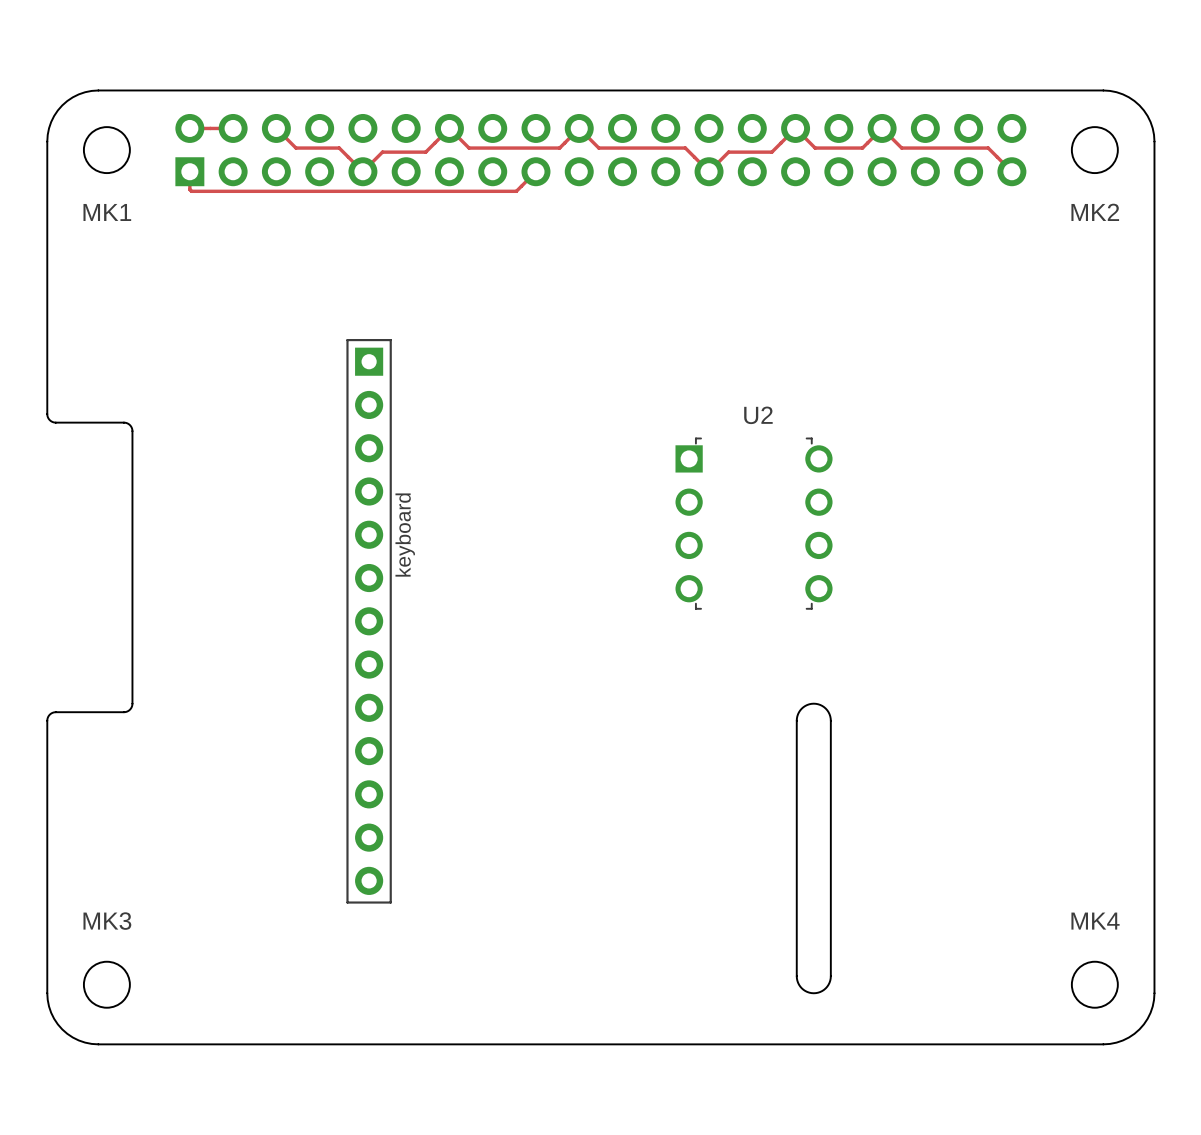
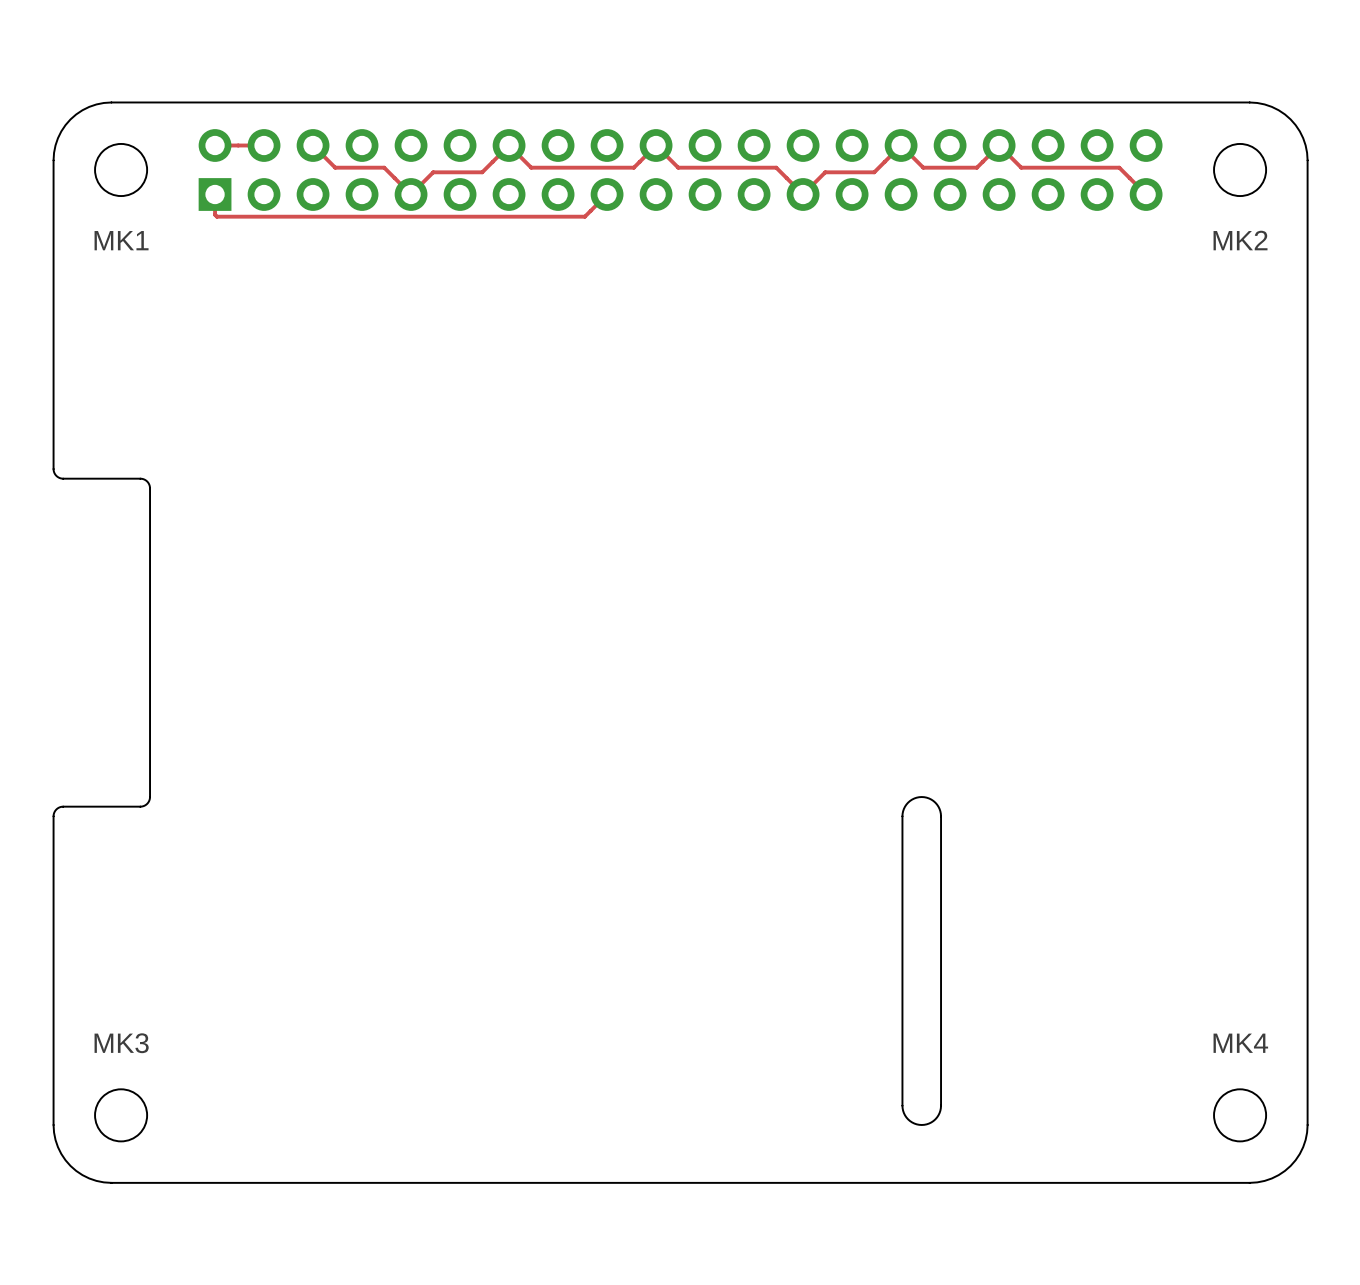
U2: (754, 523) -> none
part: keyboard (369, 621) -> none

